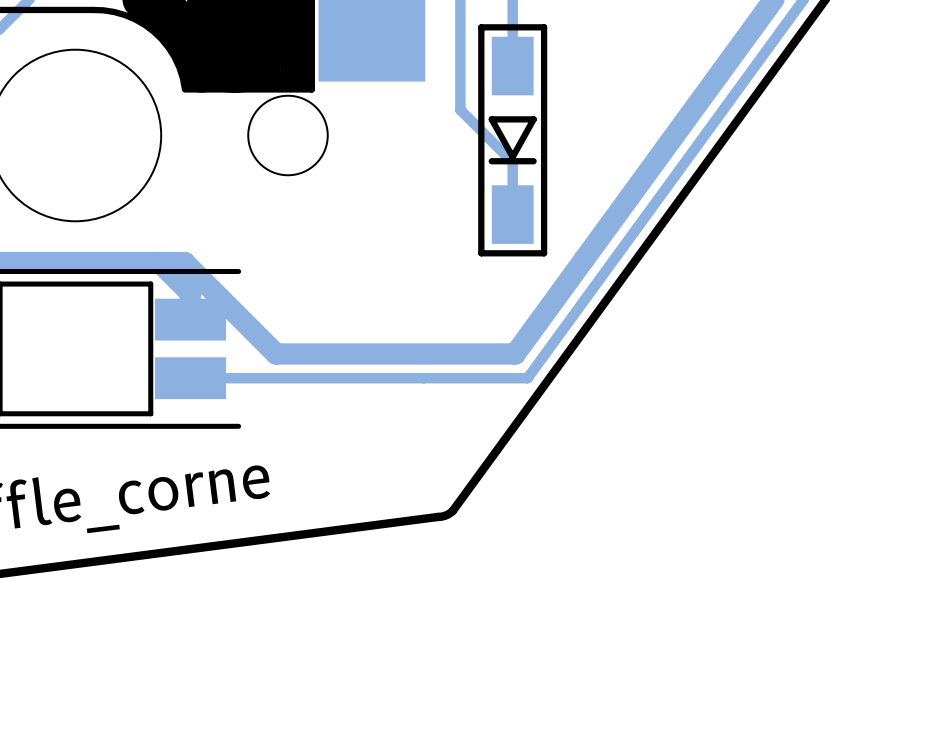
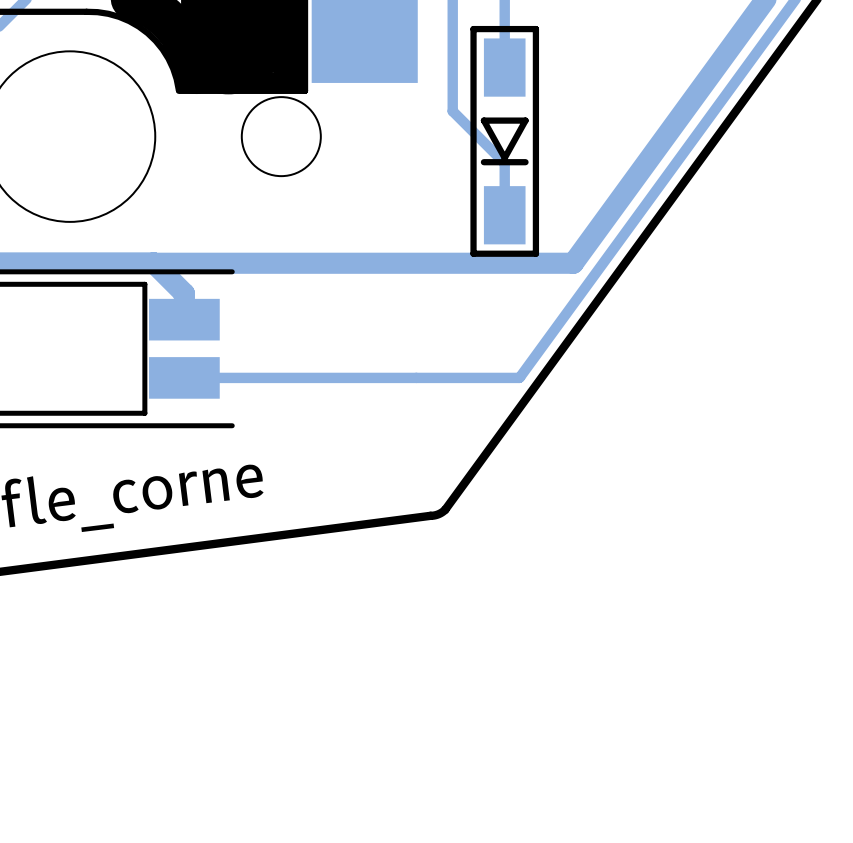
track: (159, 262) (184, 262) (276, 353) (515, 353) (581, 262) -> (154, 263) (573, 263)

